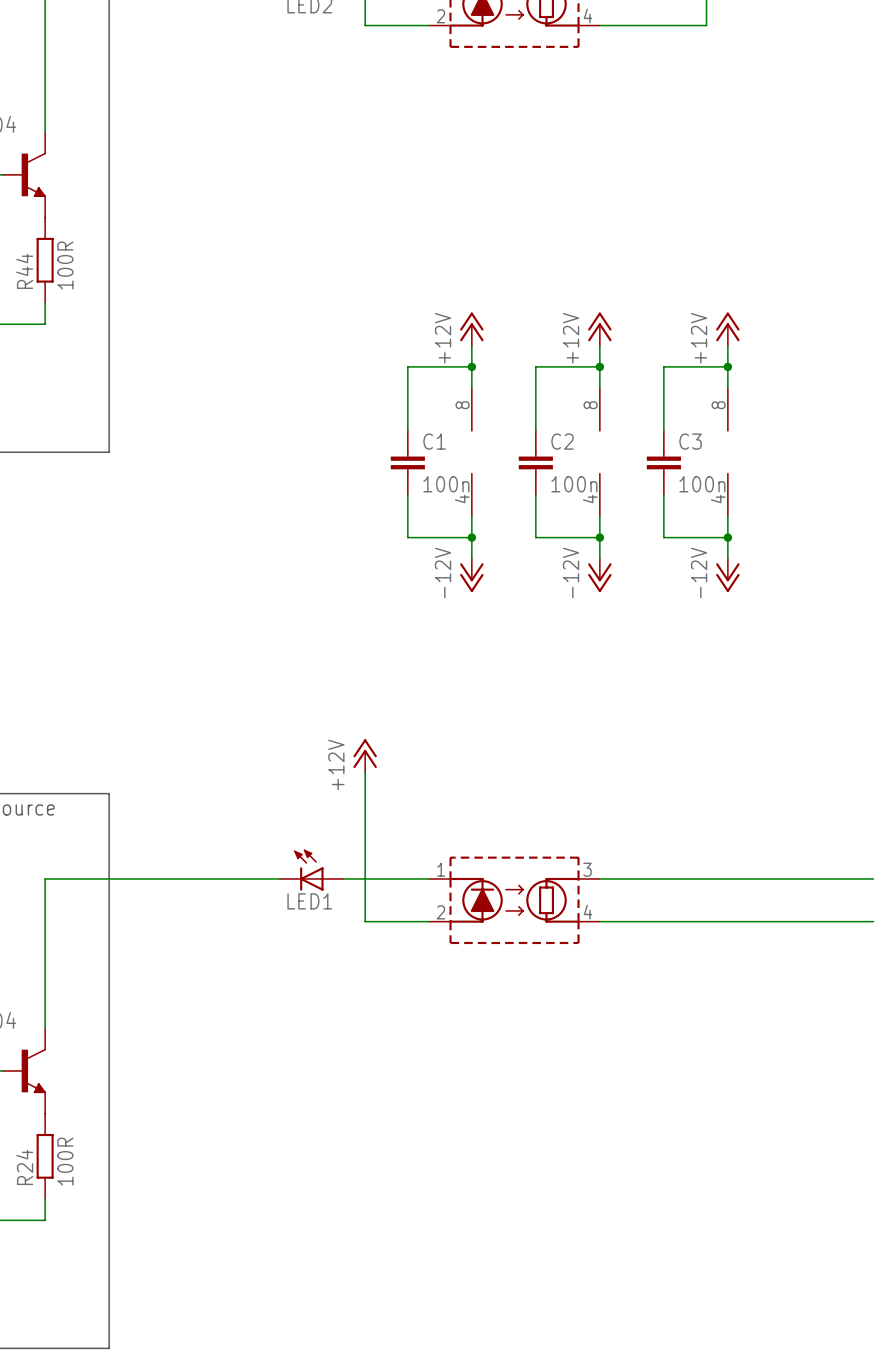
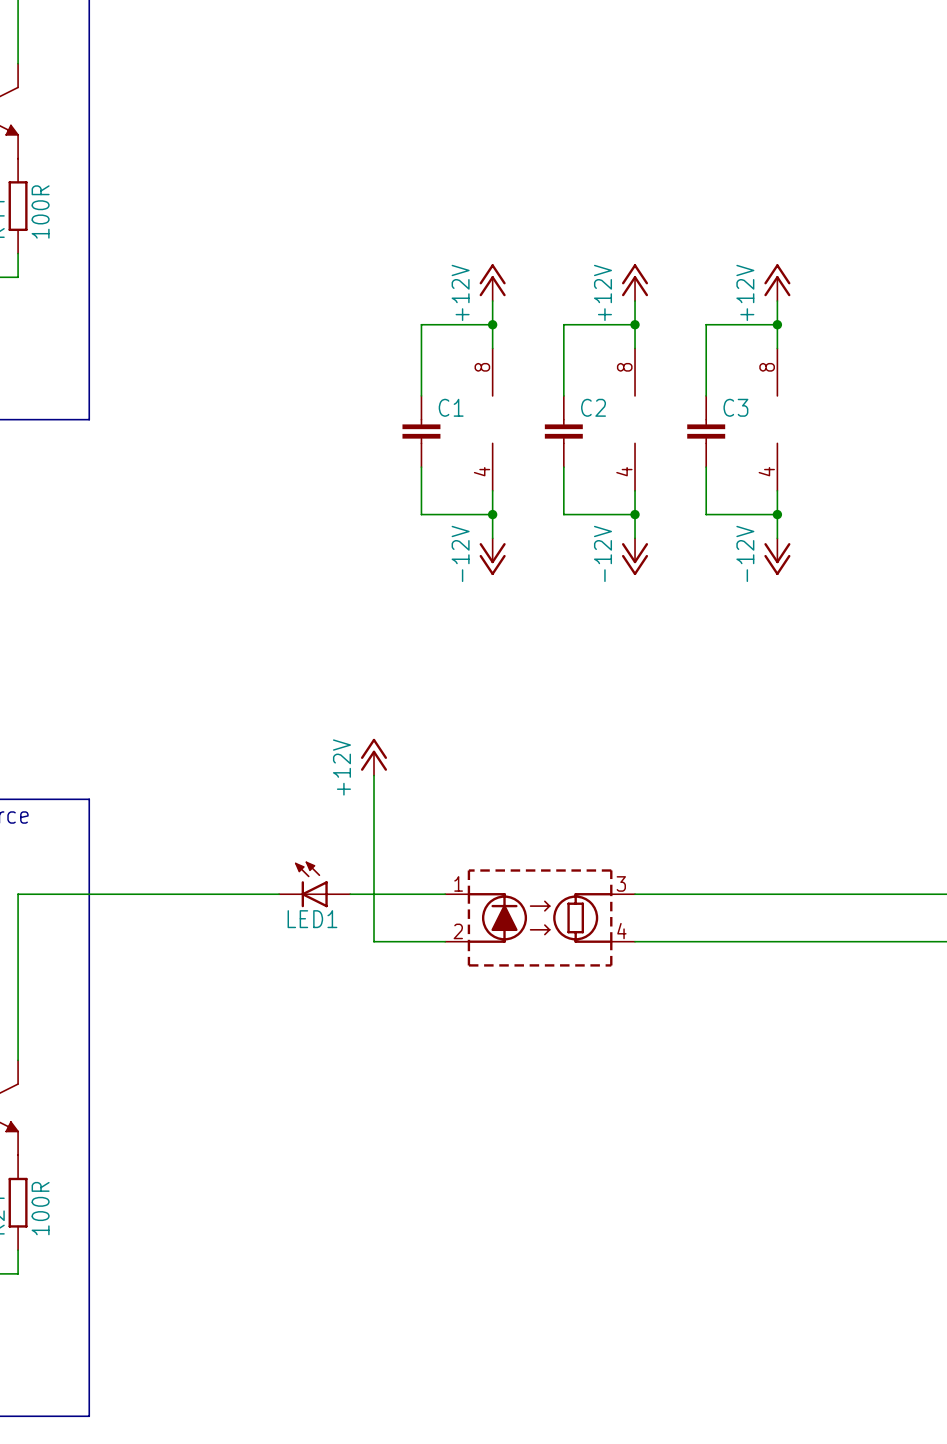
C1 value: 100n (446, 484) -> none
C2 value: 100n (574, 484) -> none
C3 value: 100n (702, 484) -> none

